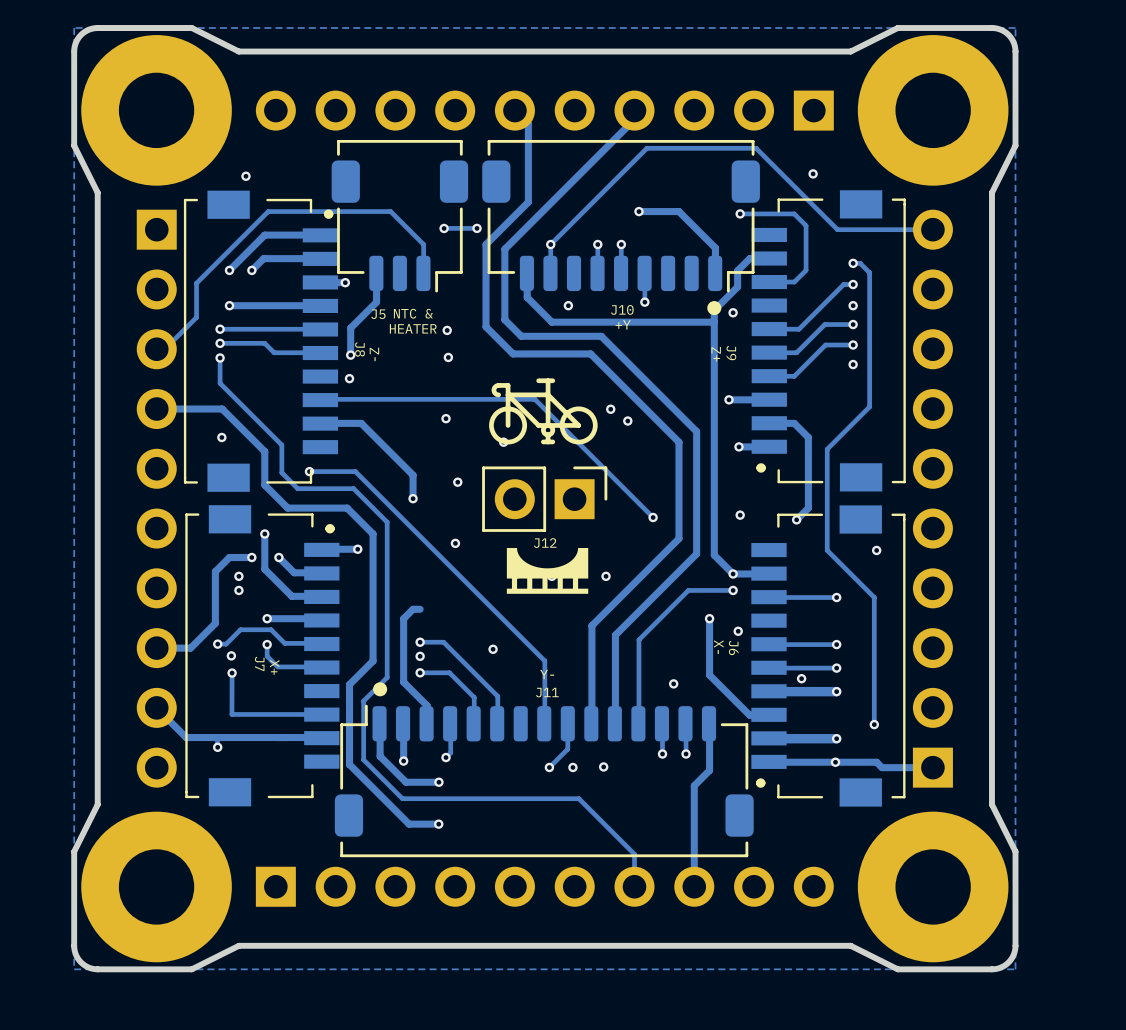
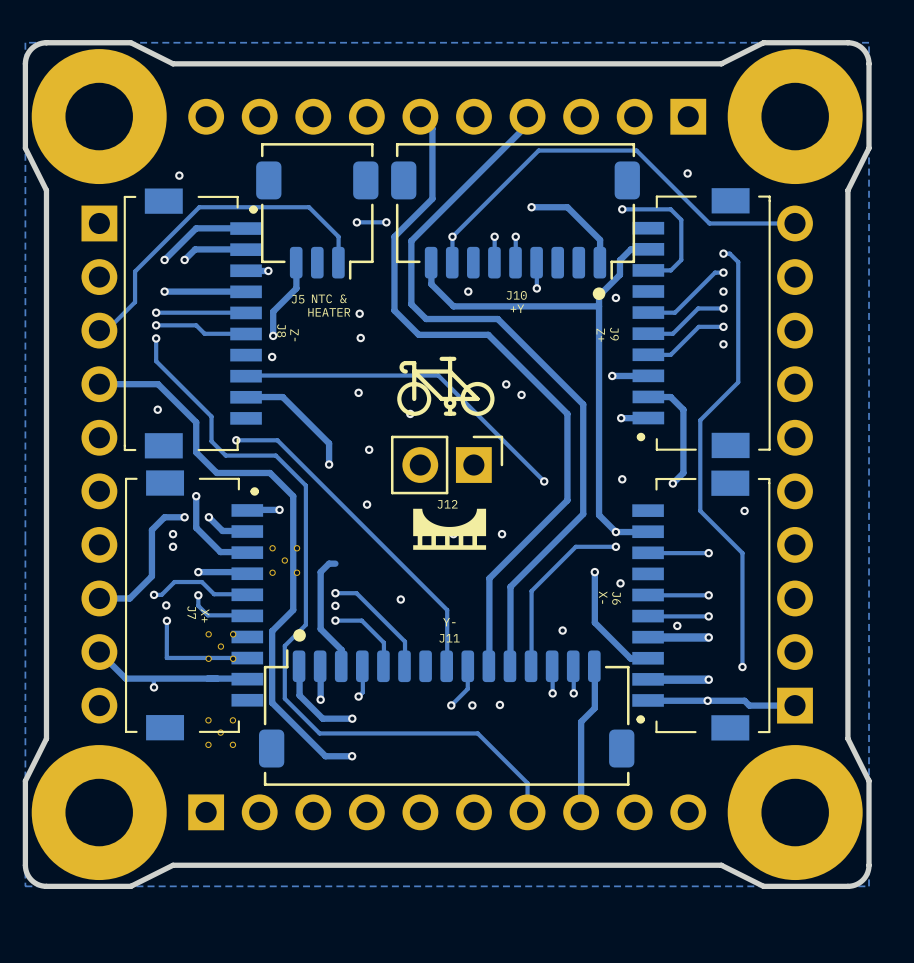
part: none -> (284, 560)
part: none -> (220, 646)
part: none -> (220, 732)

